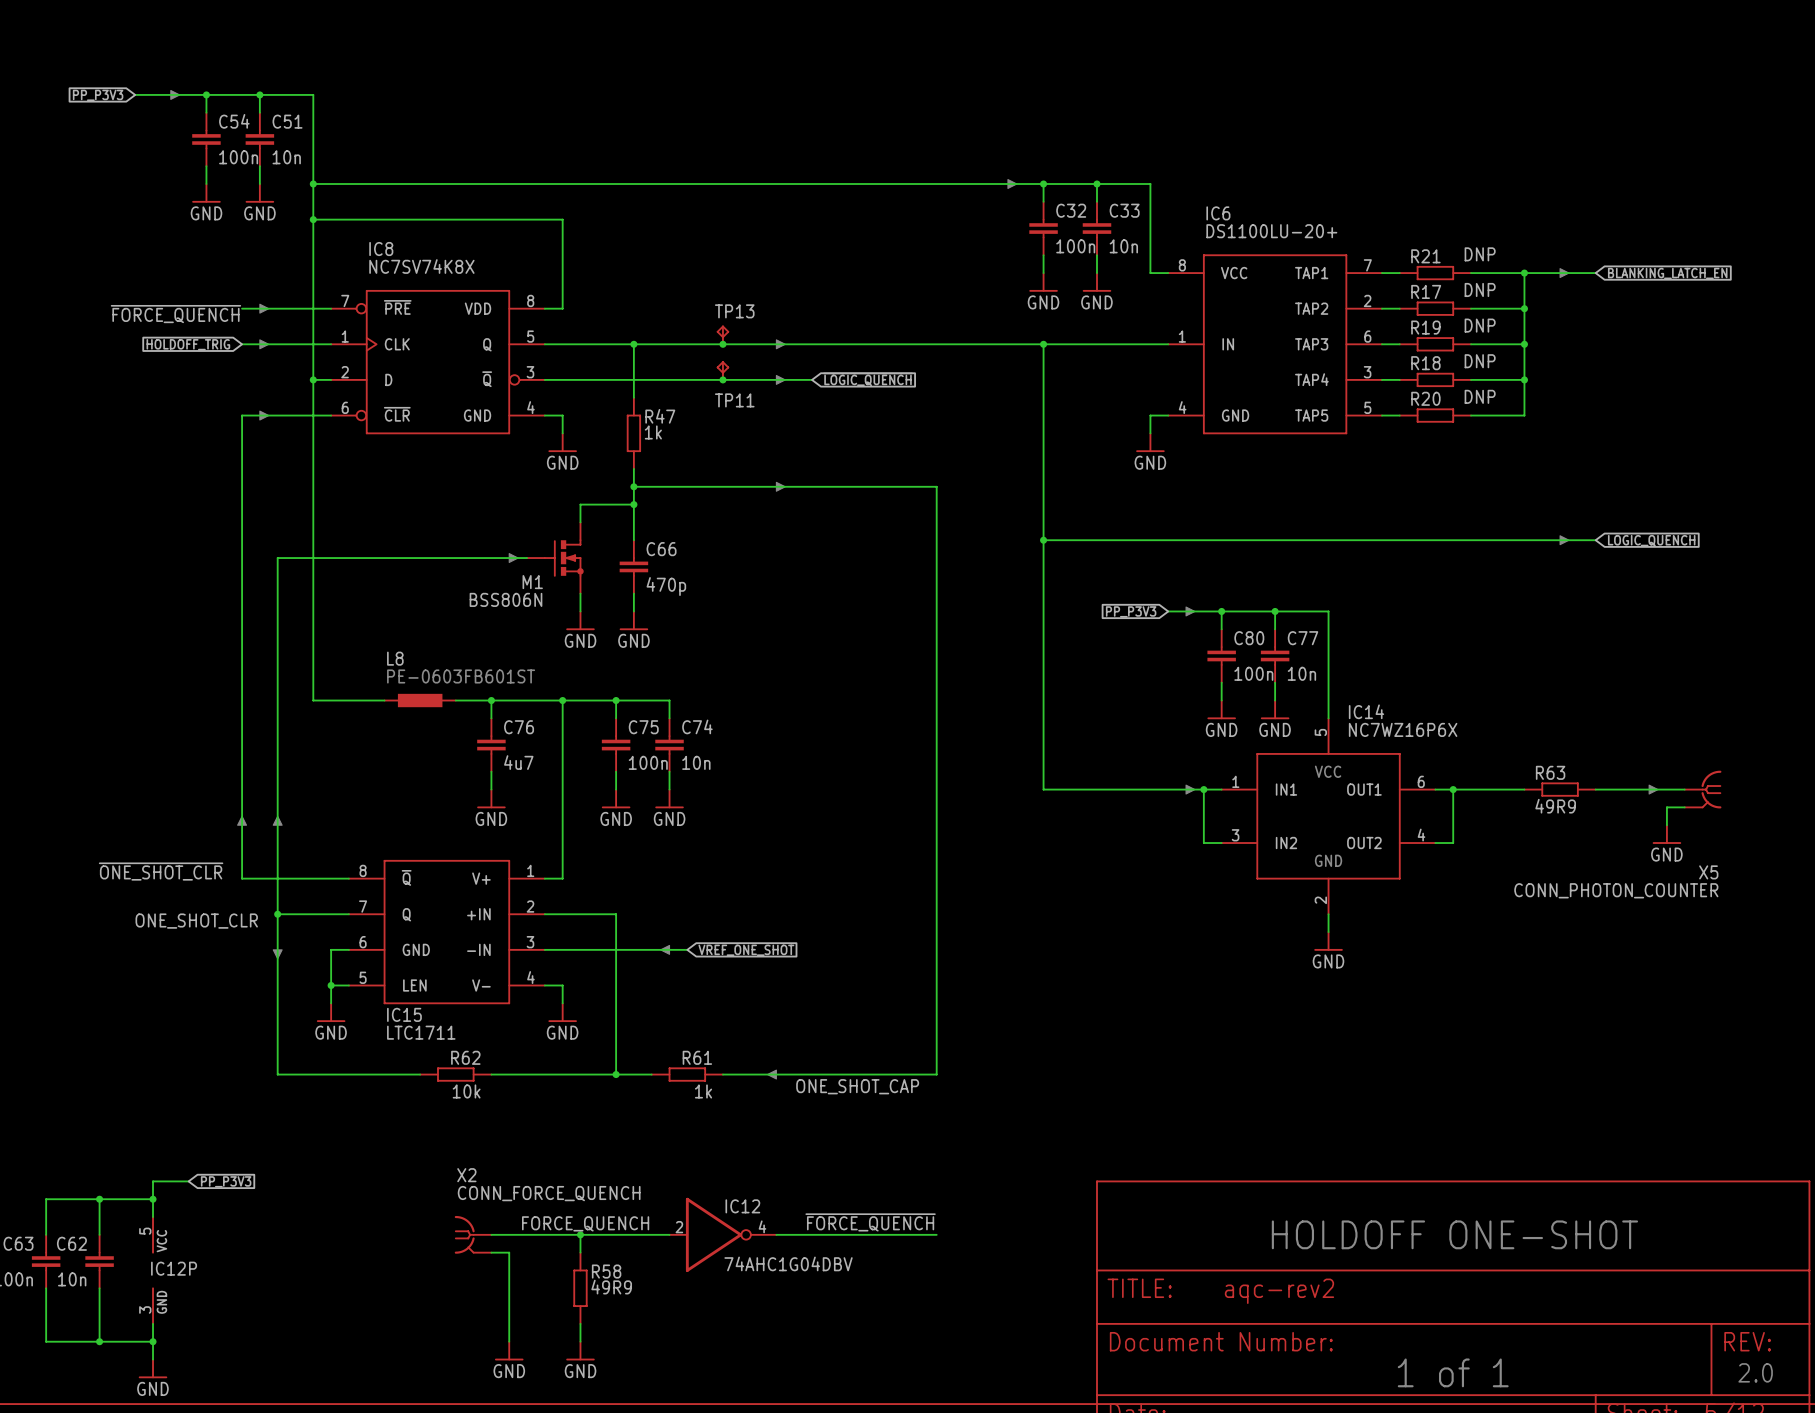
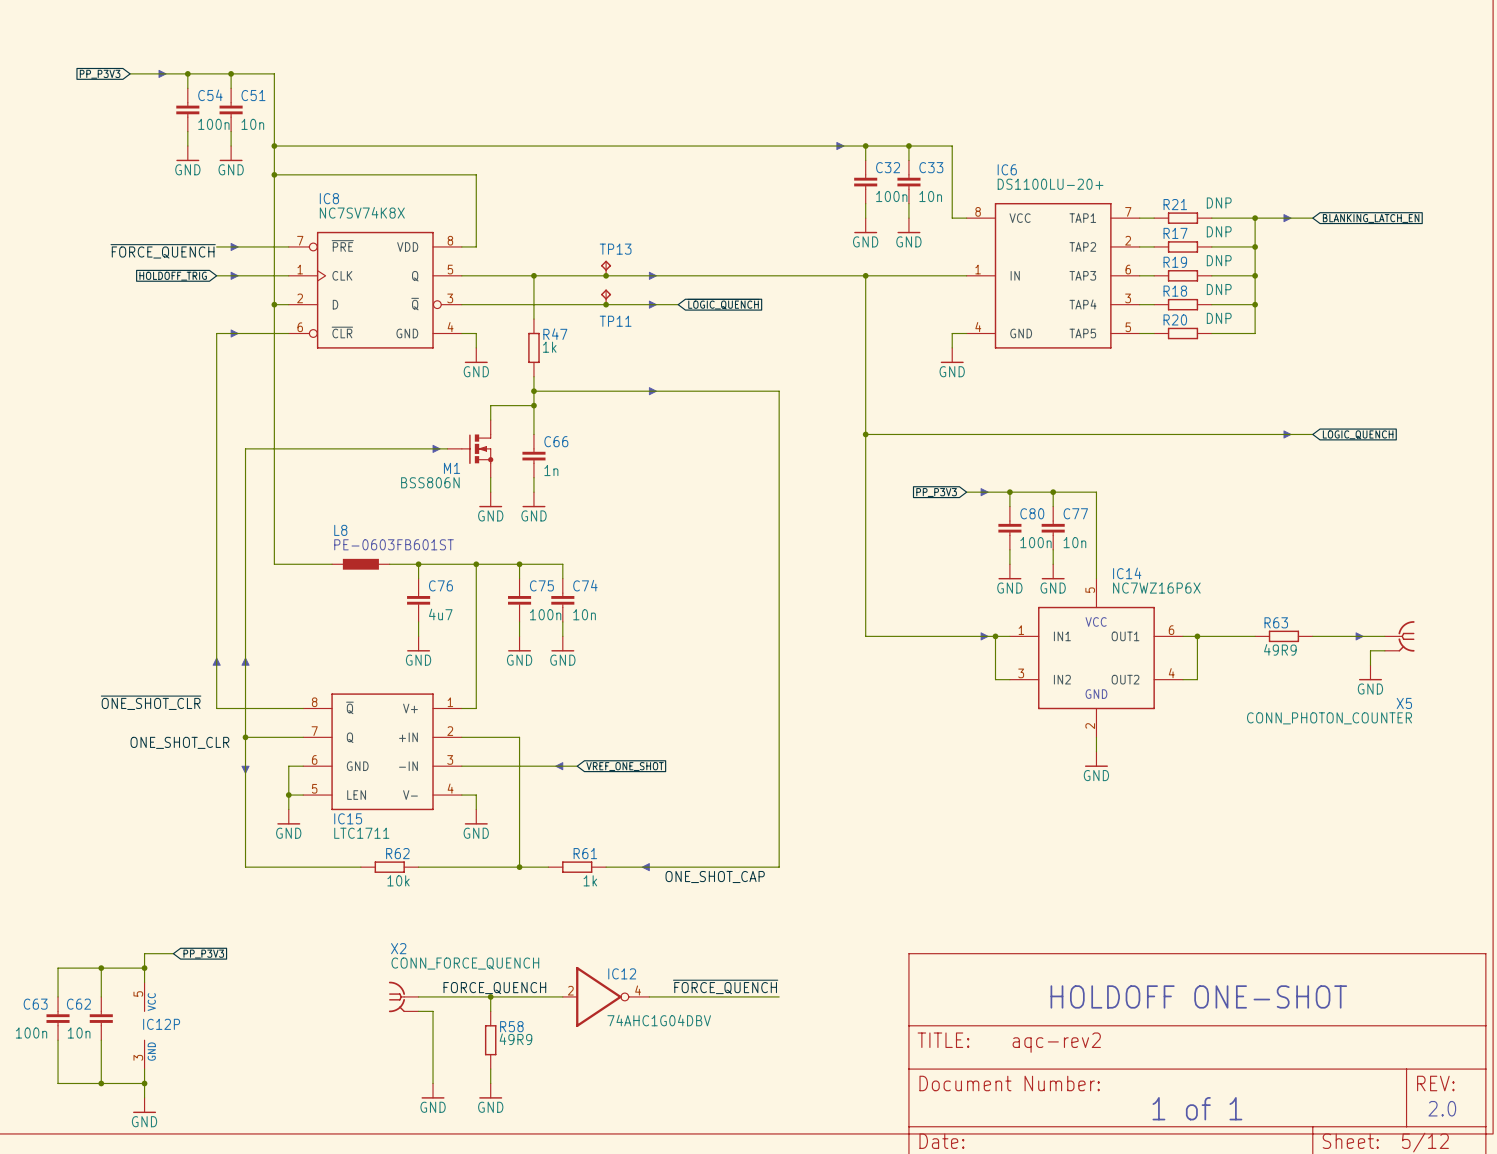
C66 value: 470p (666, 586) -> 1n (551, 470)

